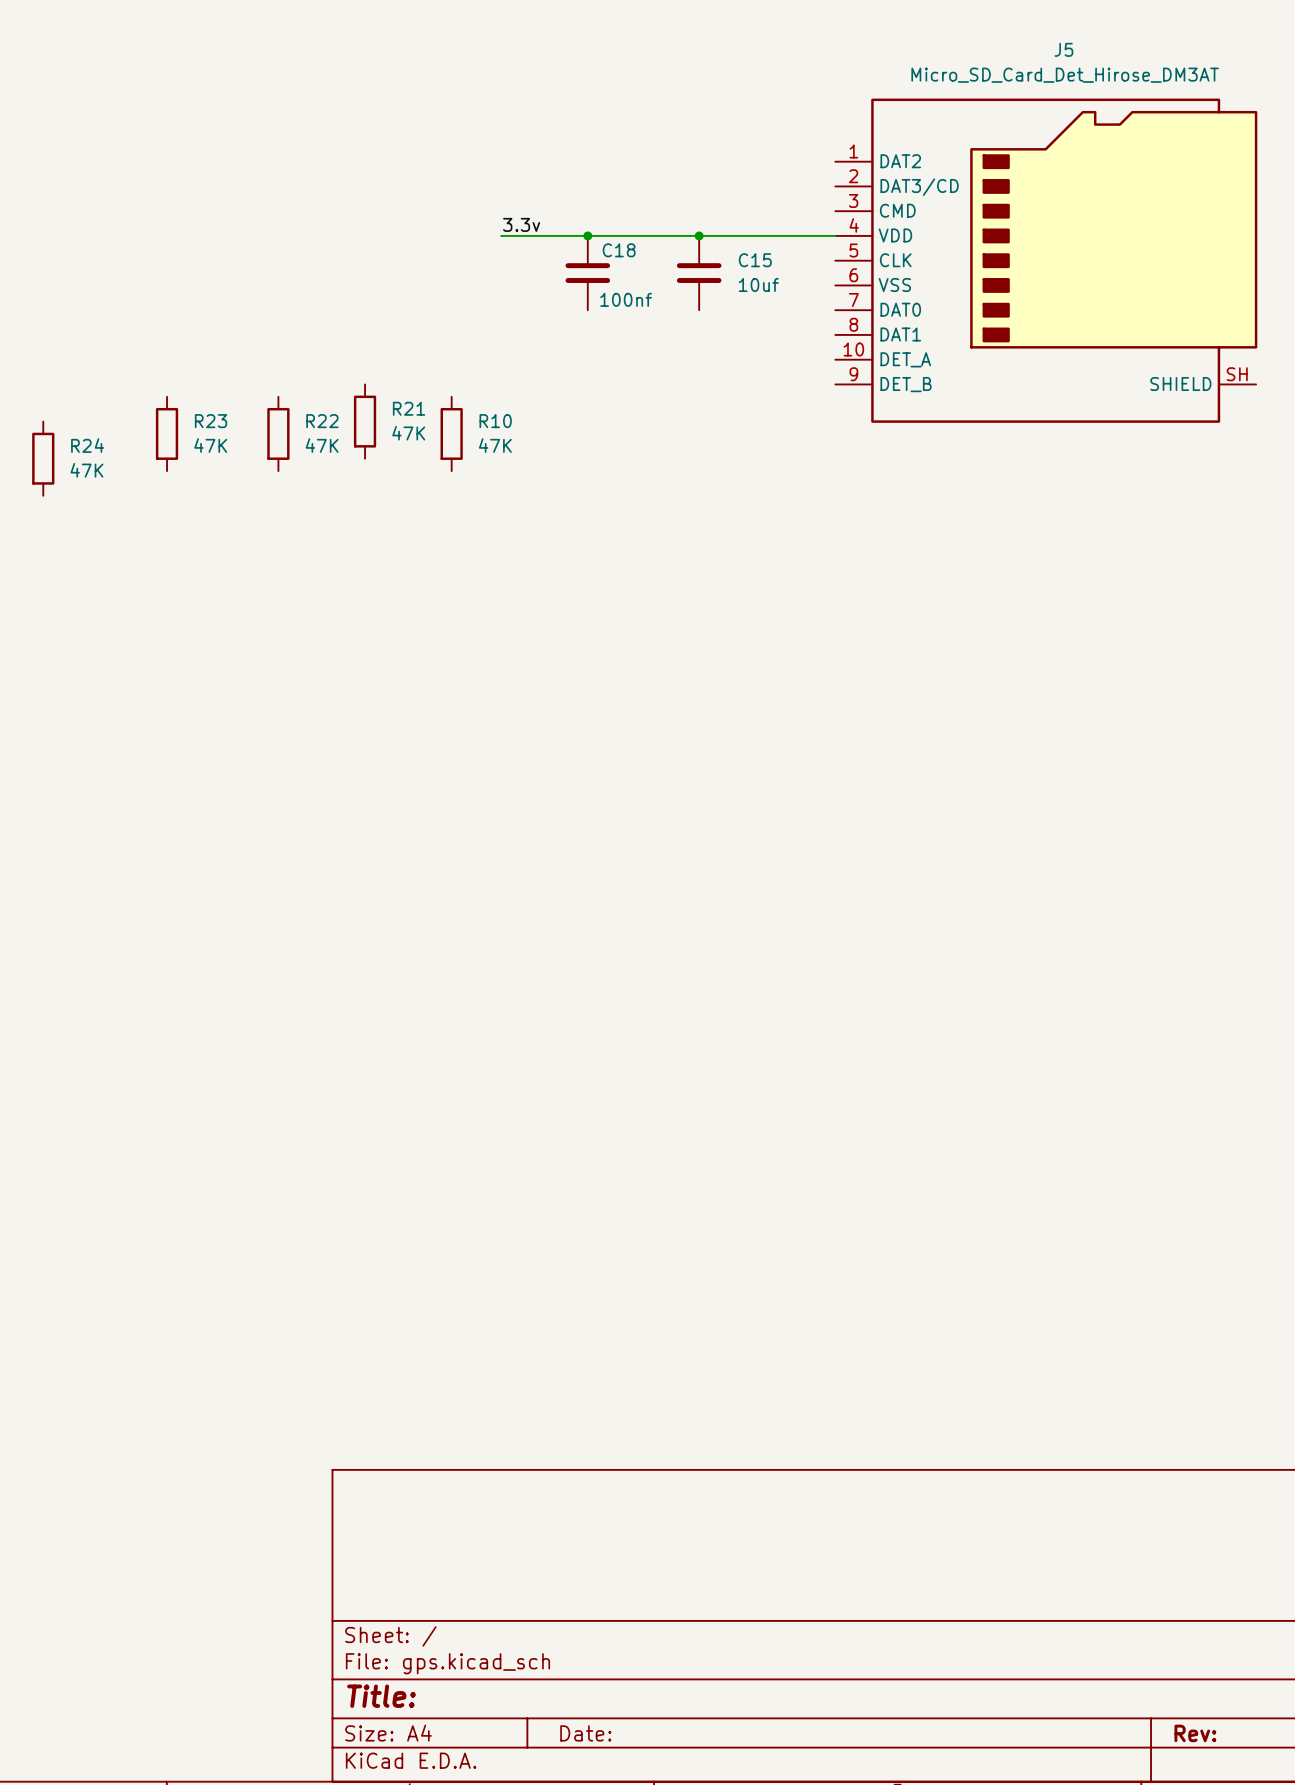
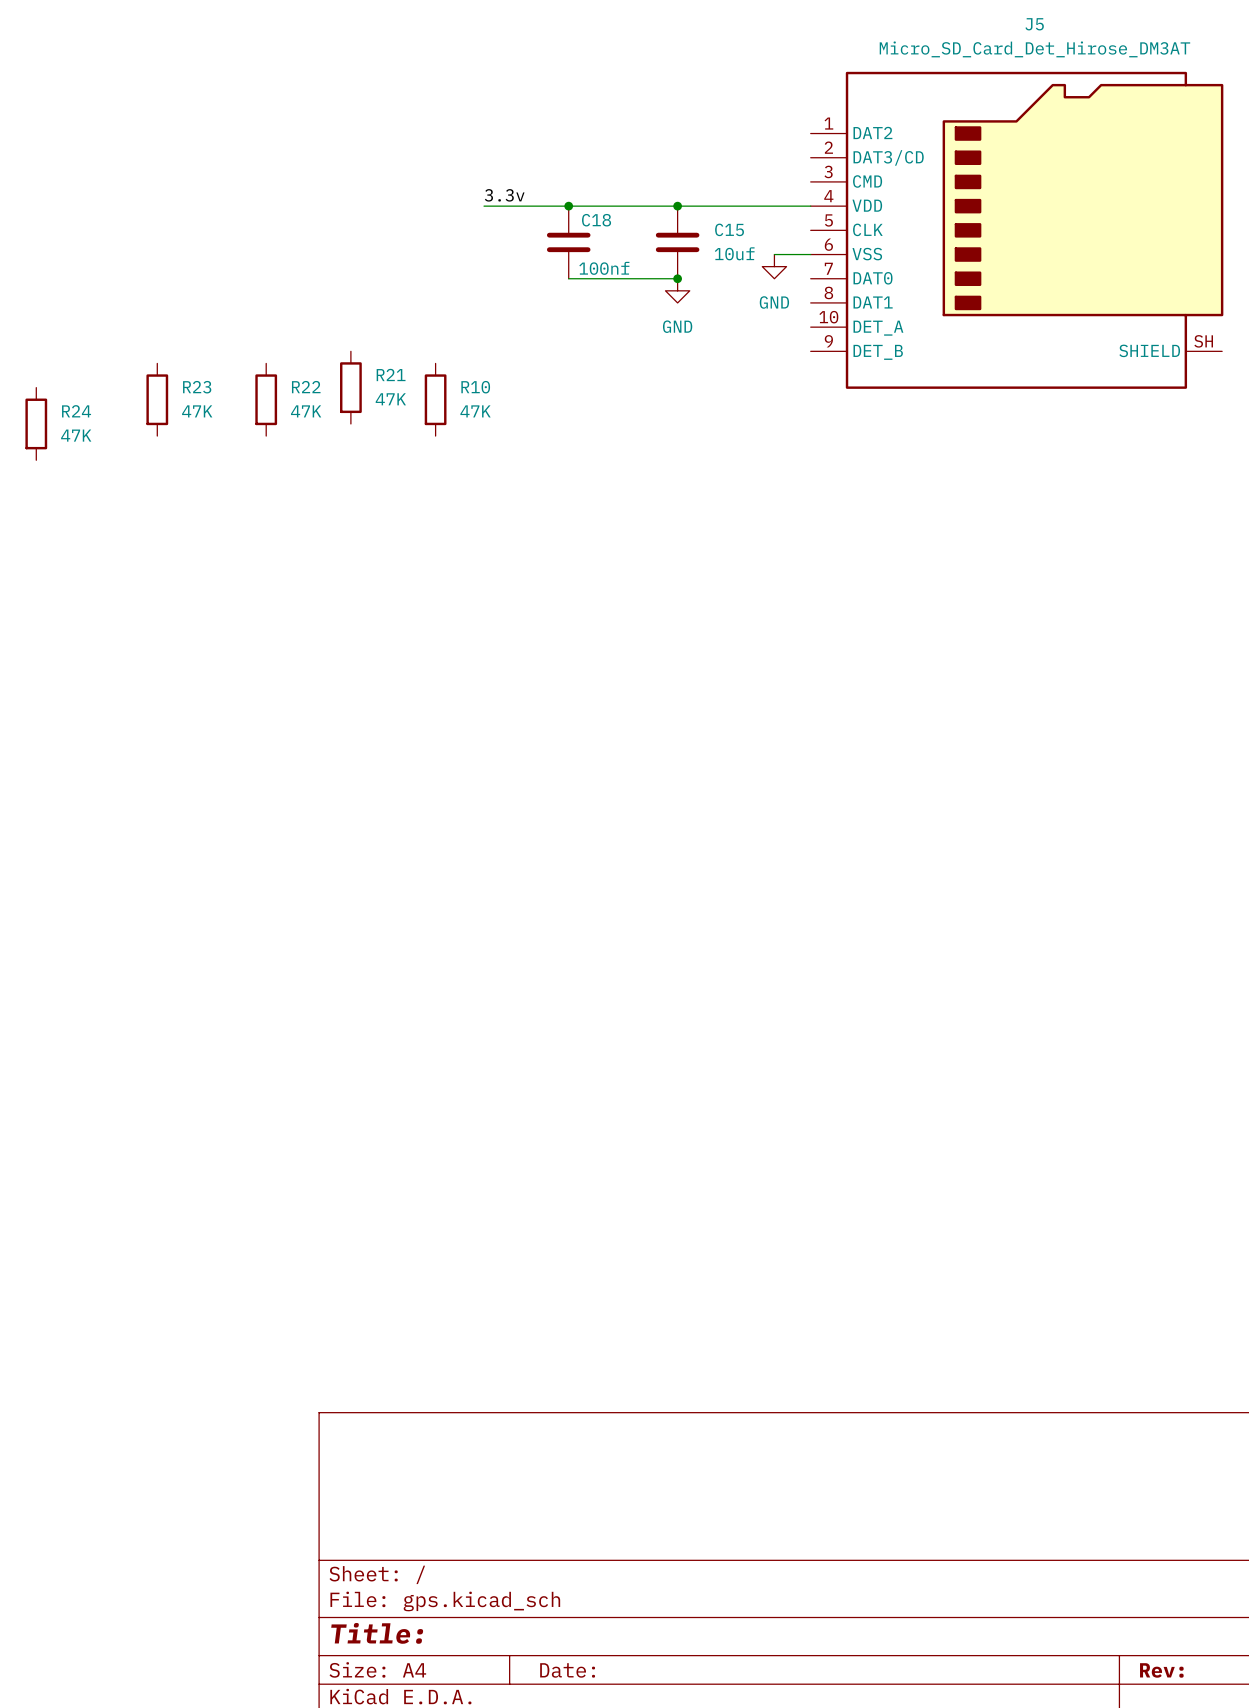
wire: none -> (774, 254) (810, 254)
power symbol: none -> GND (774, 266)
wire: none -> (568, 278) (677, 278)
junction: none -> (677, 278)
power symbol: none -> GND (677, 290)

